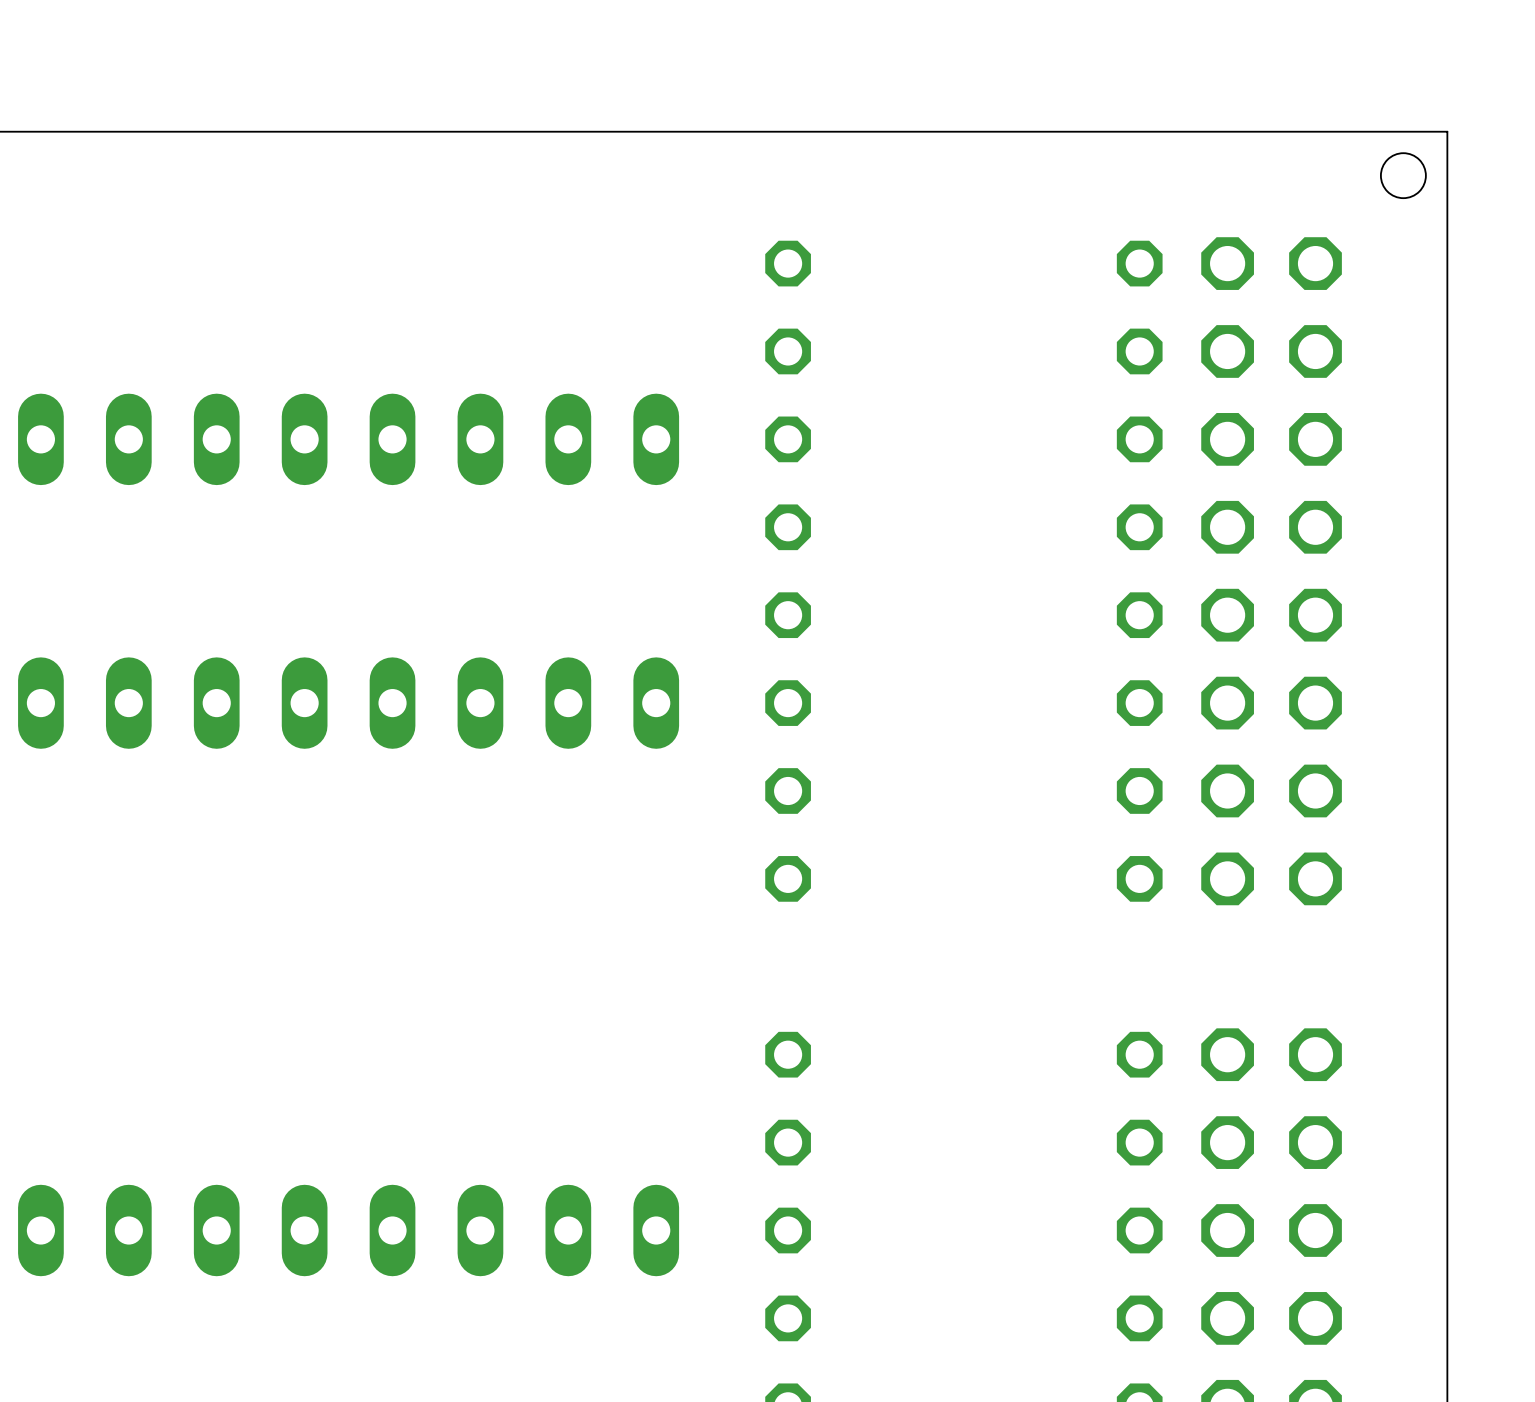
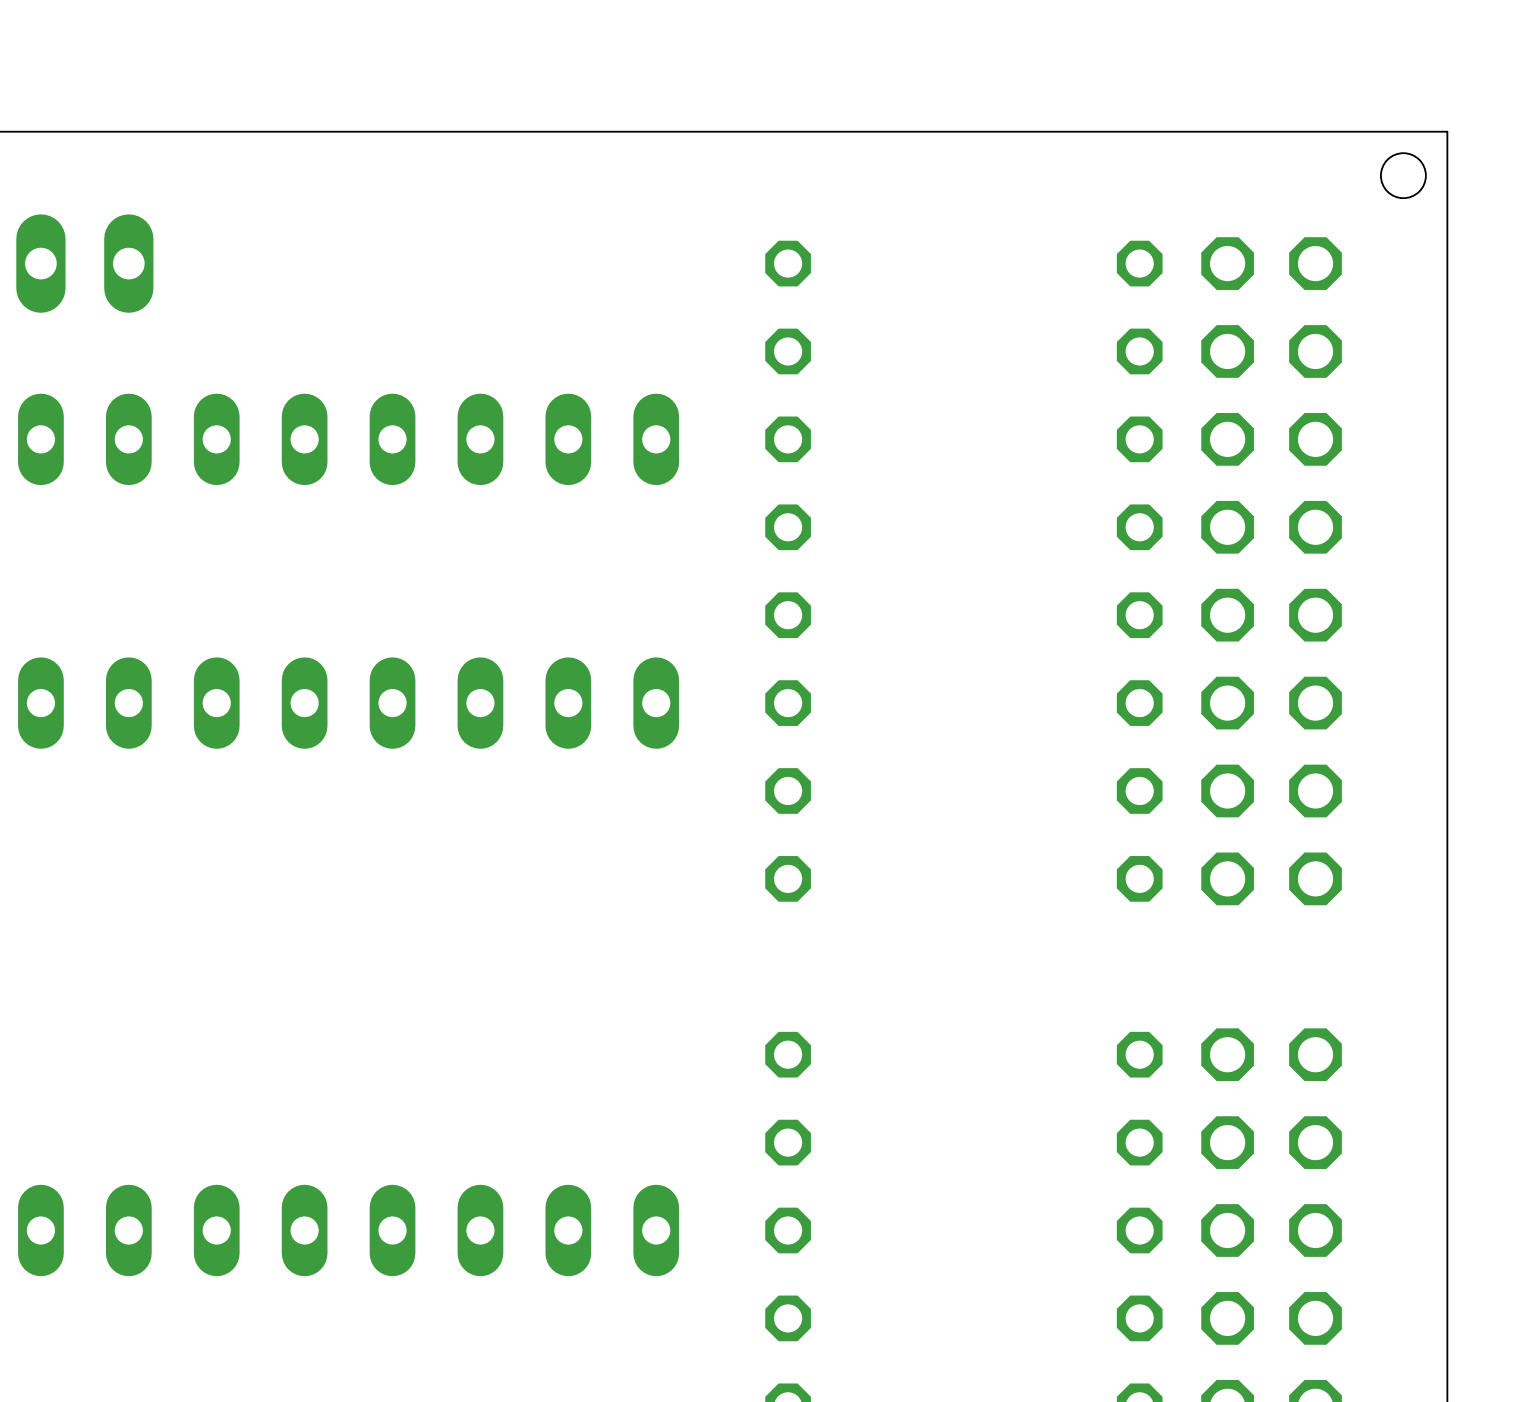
part: none -> (84, 263)

